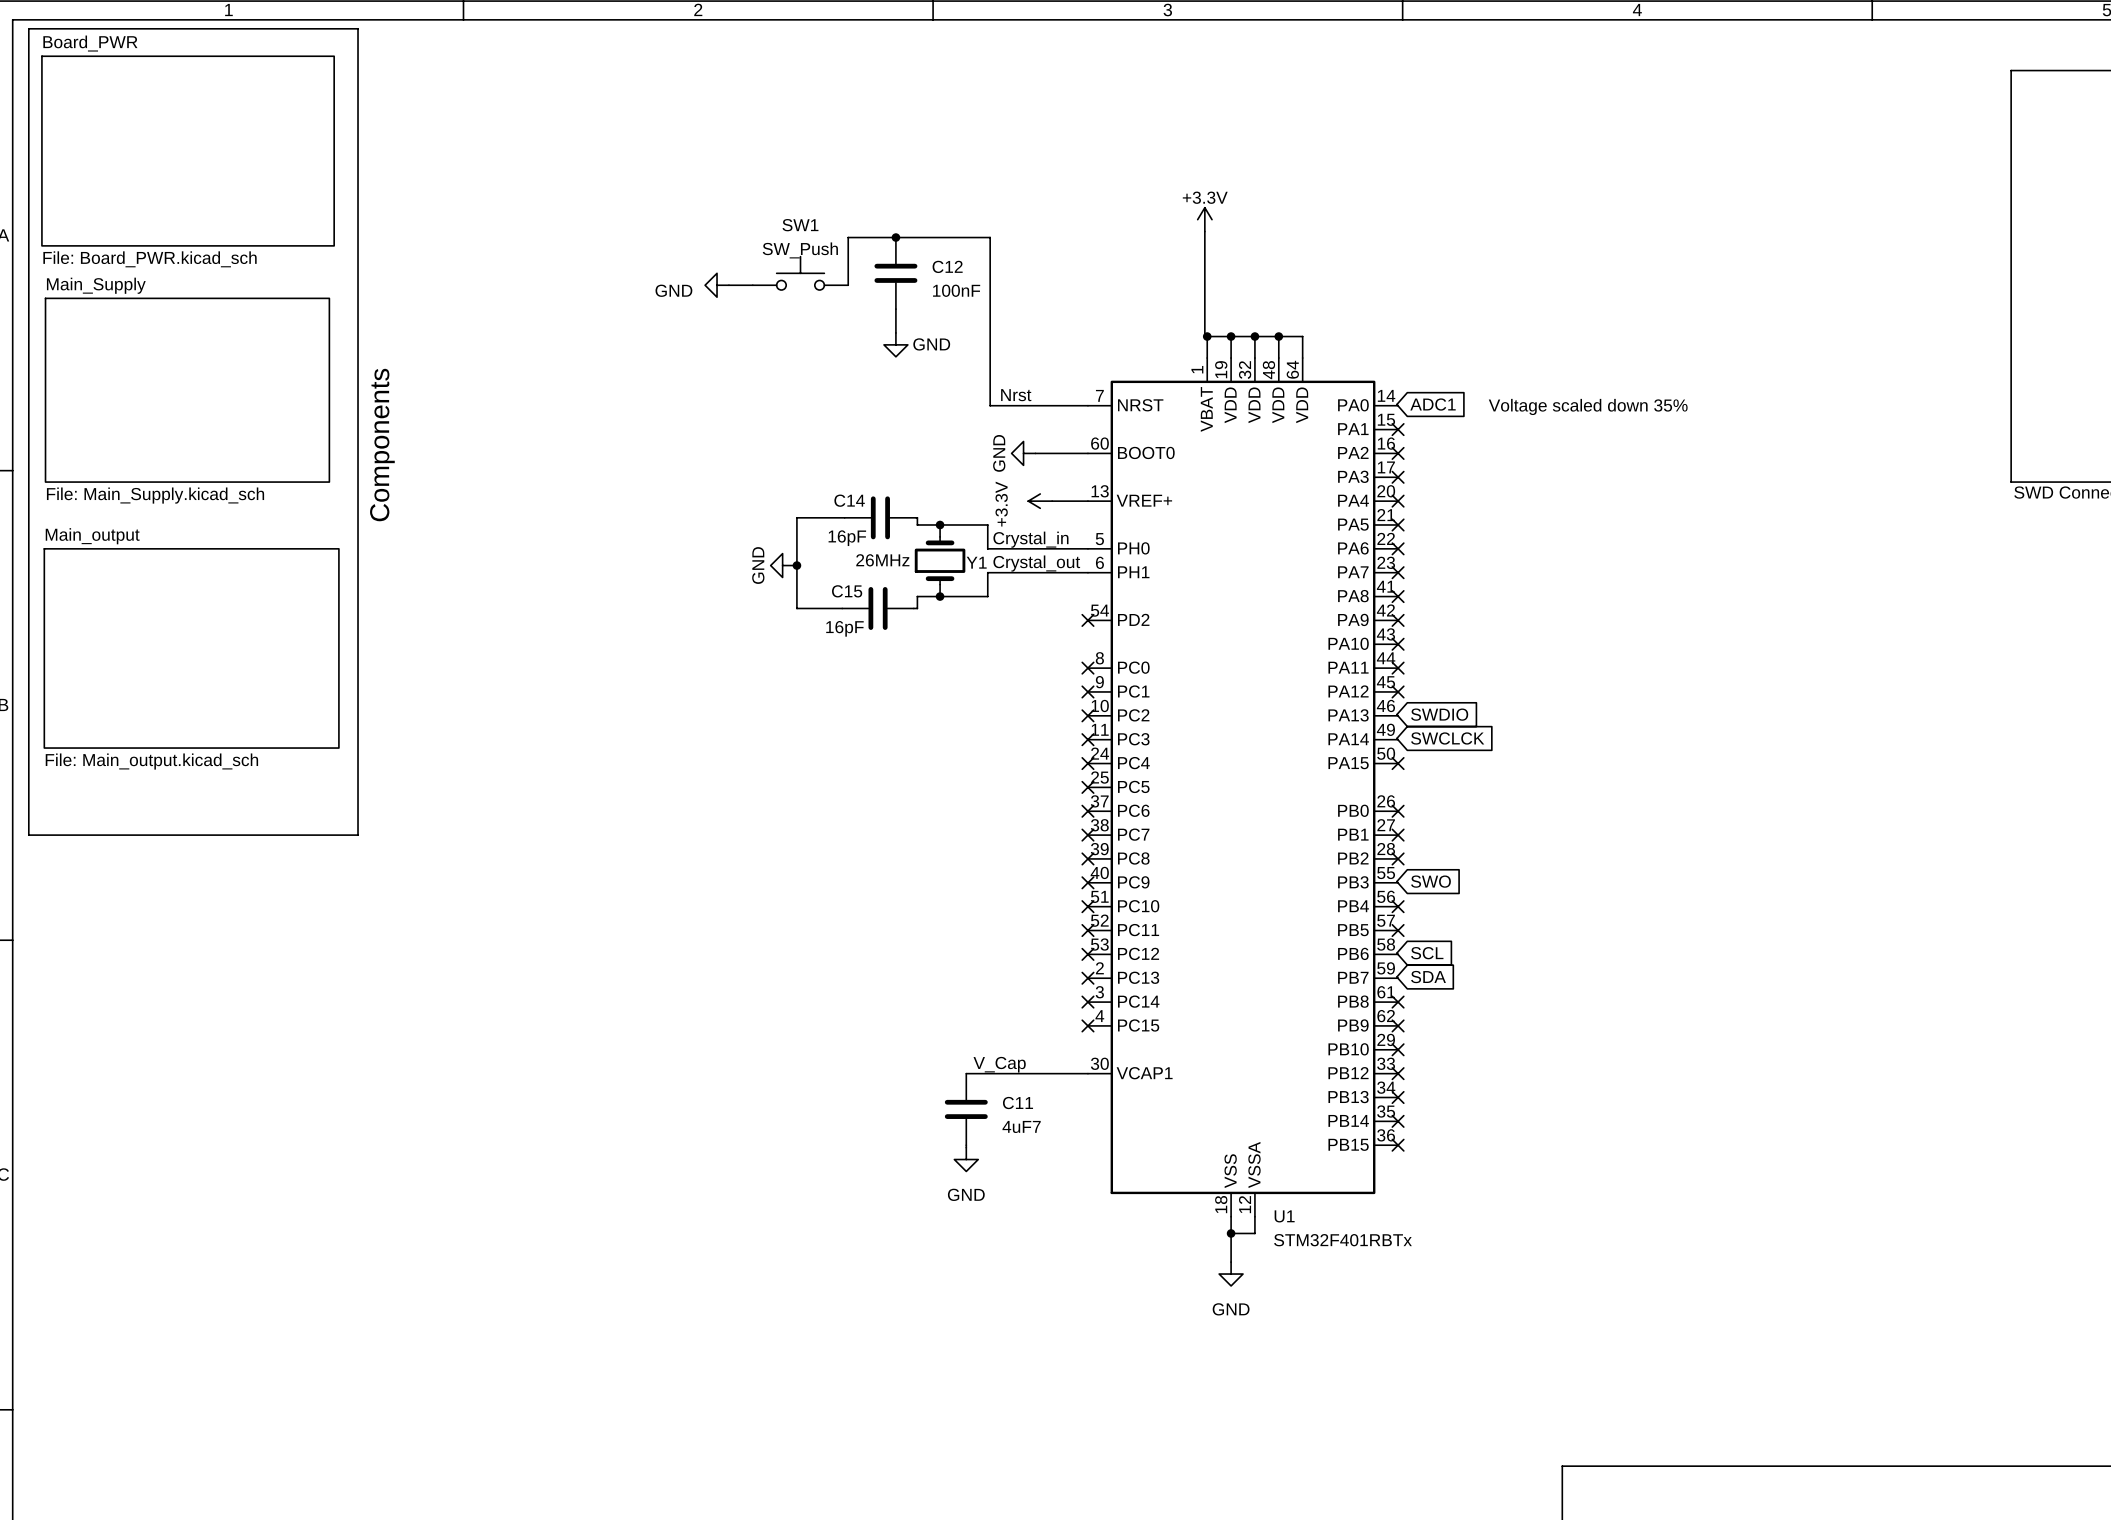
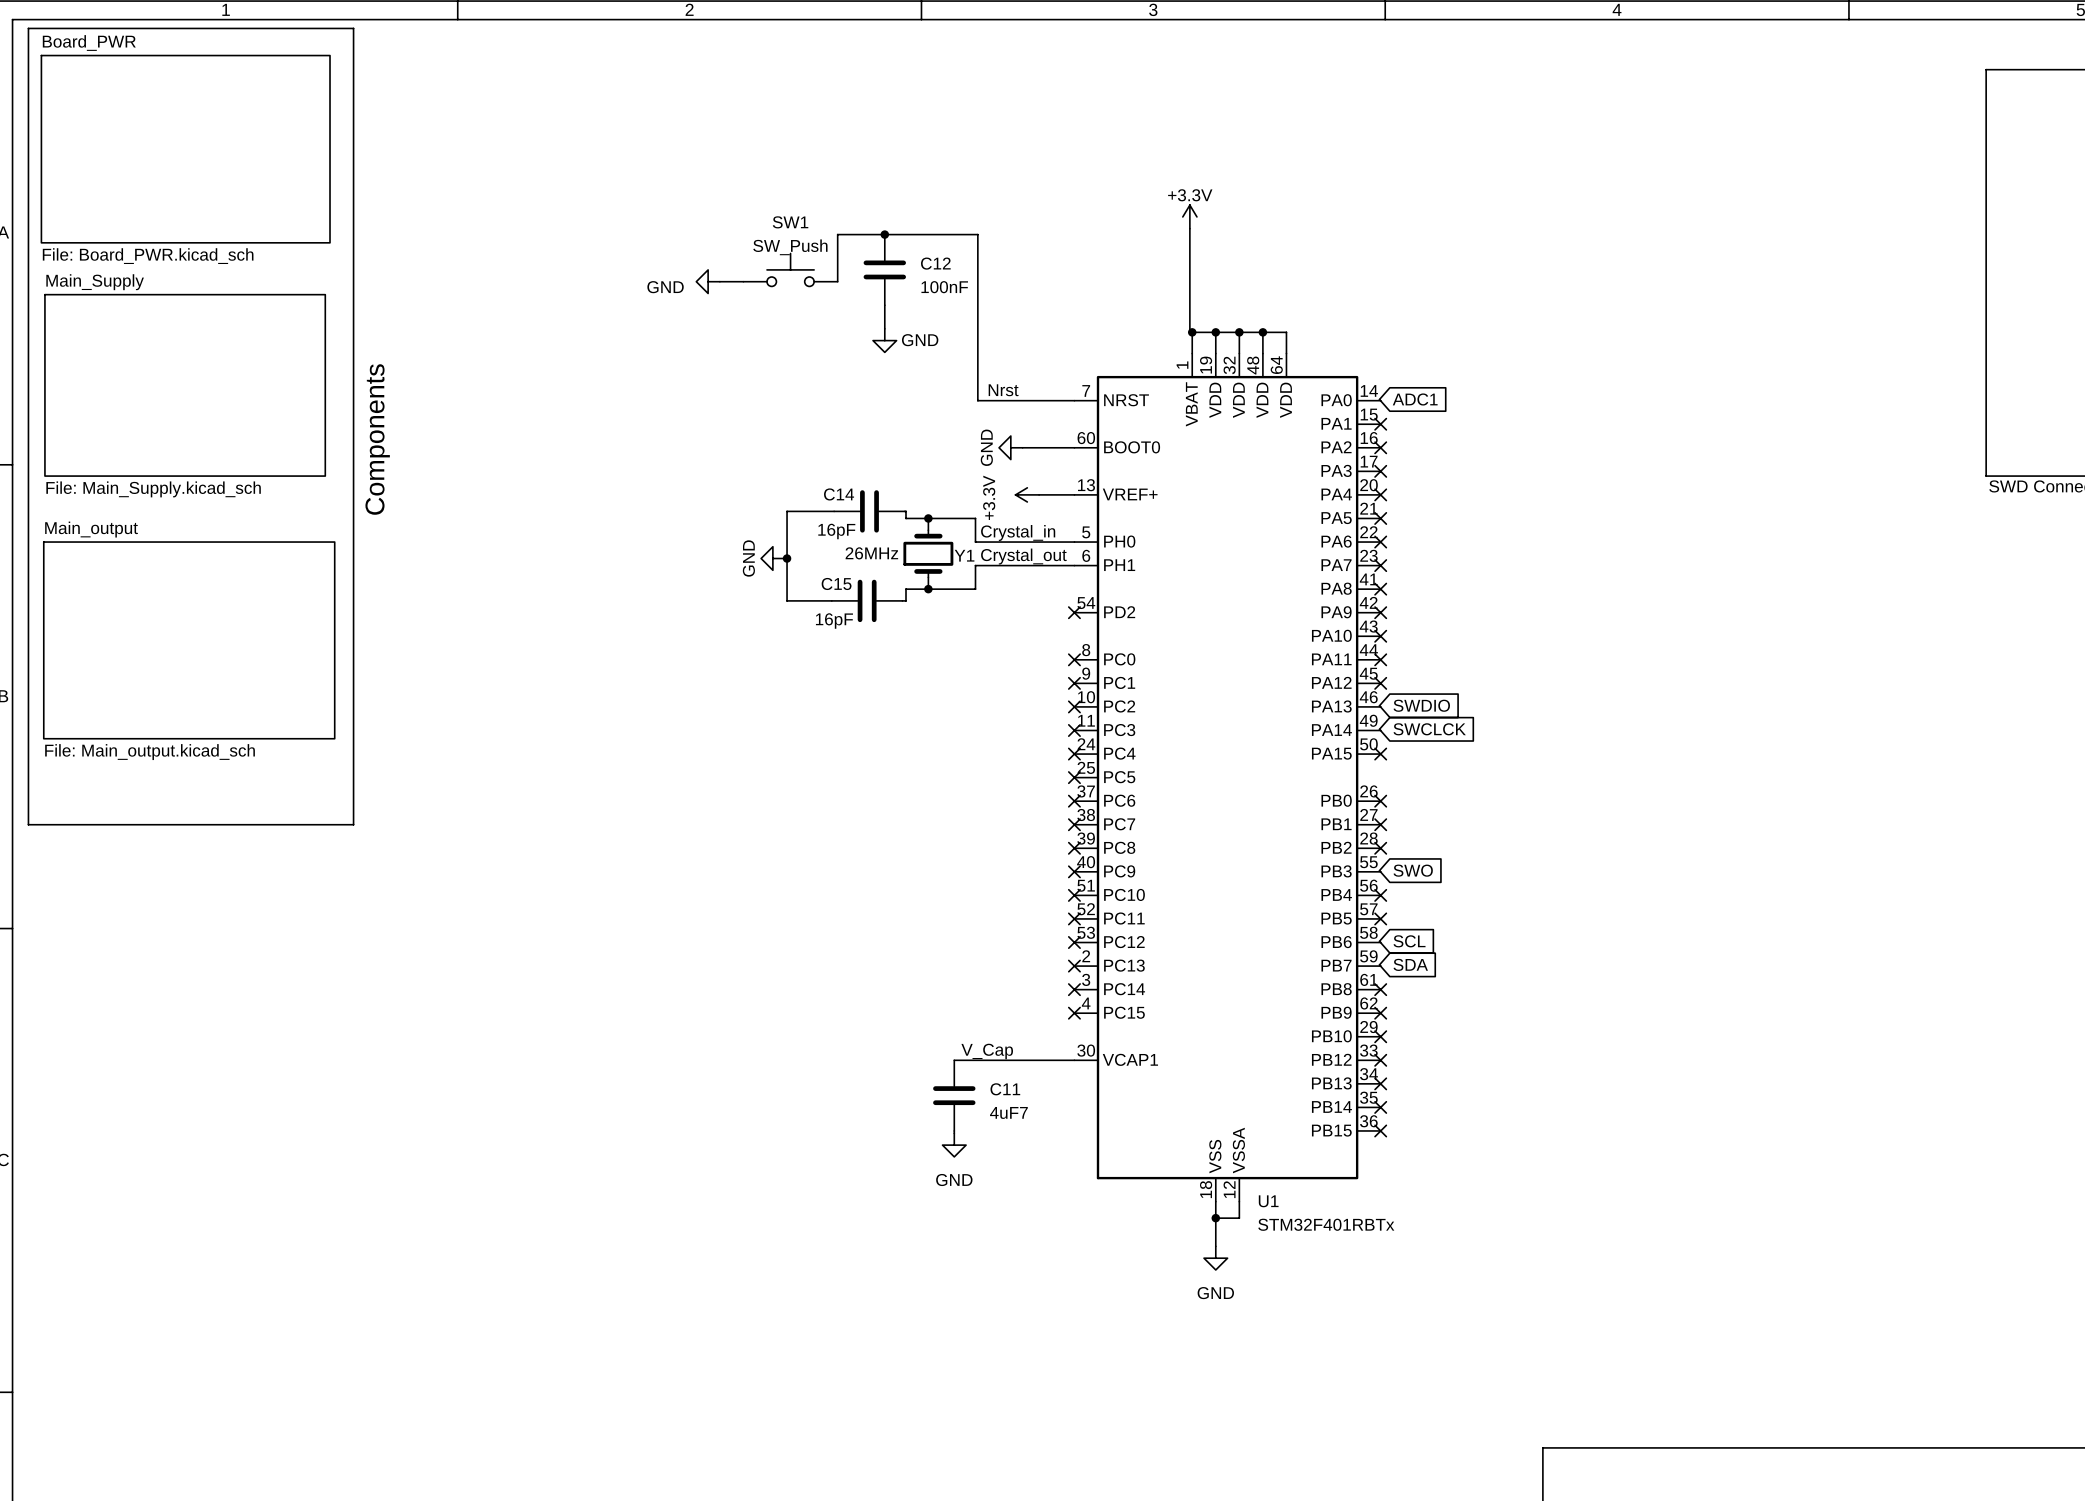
text: Voltage scaled down 35% (1588, 406) -> none

